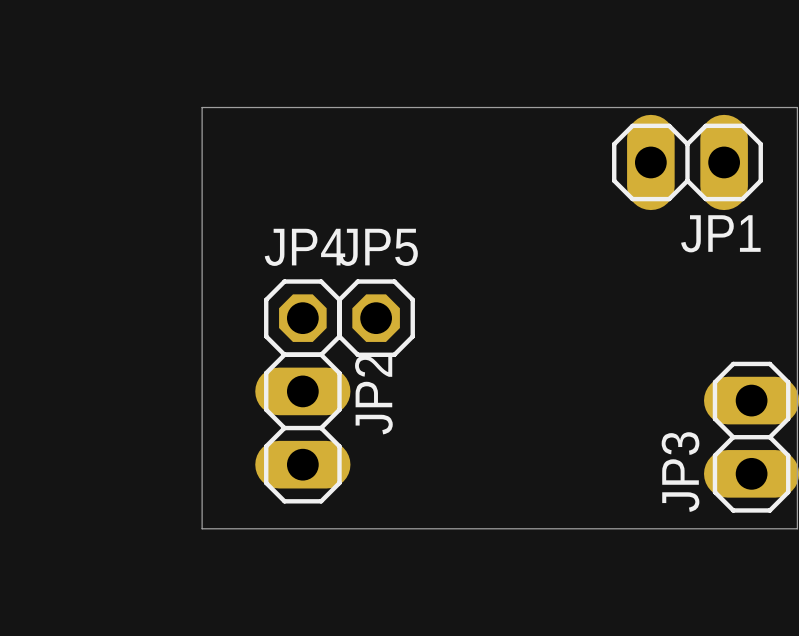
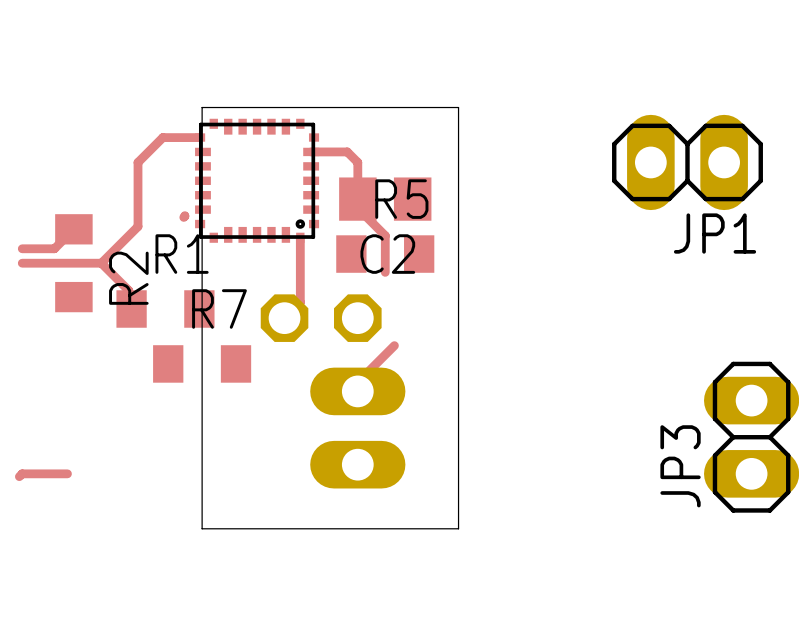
board edge: (458, 107) (797, 107) (797, 528) (458, 528) -> (458, 107) (458, 528)
track: none -> (200, 137) (162, 137) (138, 162) (138, 226) (101, 263)
track: none -> (311, 151) (347, 151) (357, 162) (357, 208) (385, 235) (385, 272)
part: none -> (257, 180)
C2: none -> (385, 199)
track: none -> (184, 215) (183, 217)
track: none -> (73, 229) (54, 248) (22, 248)
track: none -> (300, 237) (300, 302) (284, 318)
R5: none -> (385, 254)
track: none -> (22, 263) (101, 263)
R2: none -> (73, 263)
track: none -> (101, 263) (128, 290) (128, 306) (131, 308)
R1: none -> (165, 308)
JP4 side: top (302, 318) -> bottom (357, 318)
JP5 side: top (376, 318) -> bottom (284, 318)
track: none -> (394, 345) (357, 382) (357, 391)
R7: none -> (202, 363)
JP2 side: top (302, 428) -> bottom (357, 428)
track: none -> (67, 473) (22, 473) (19, 476)

